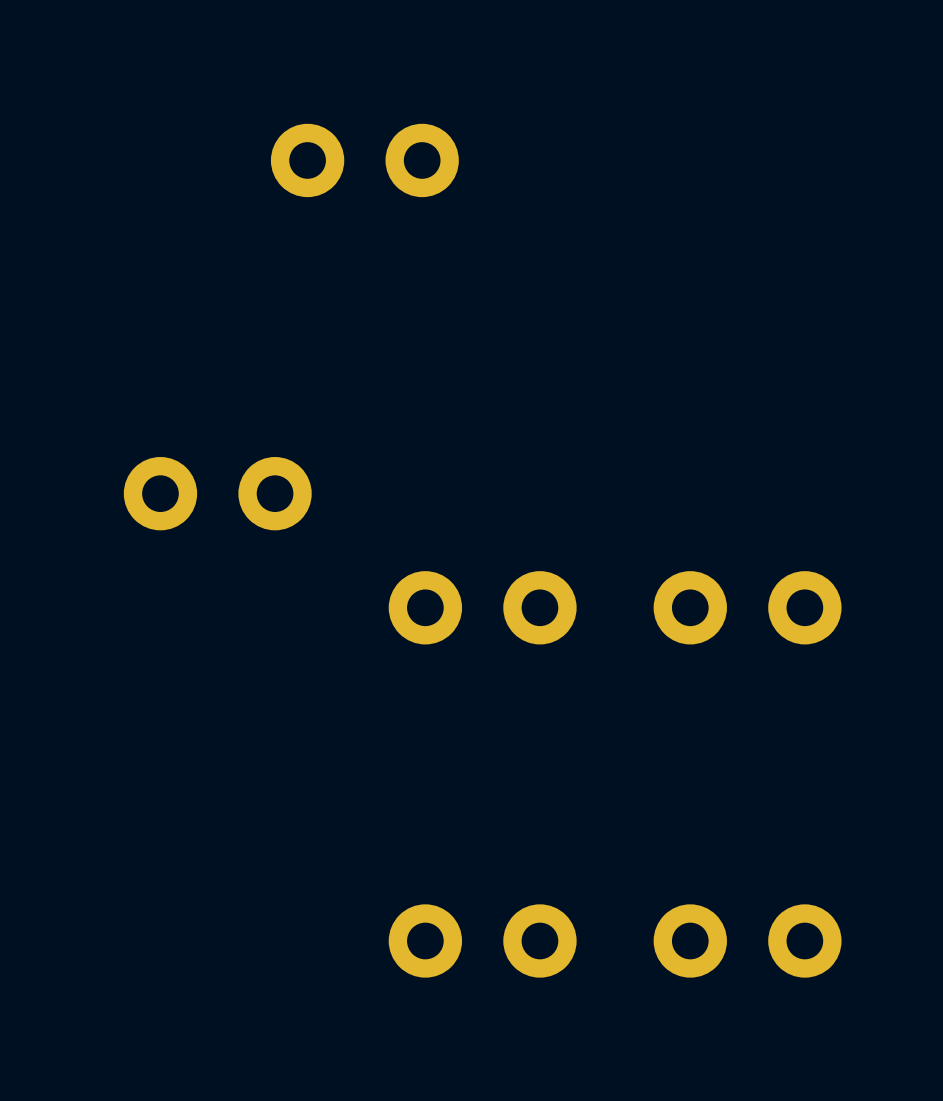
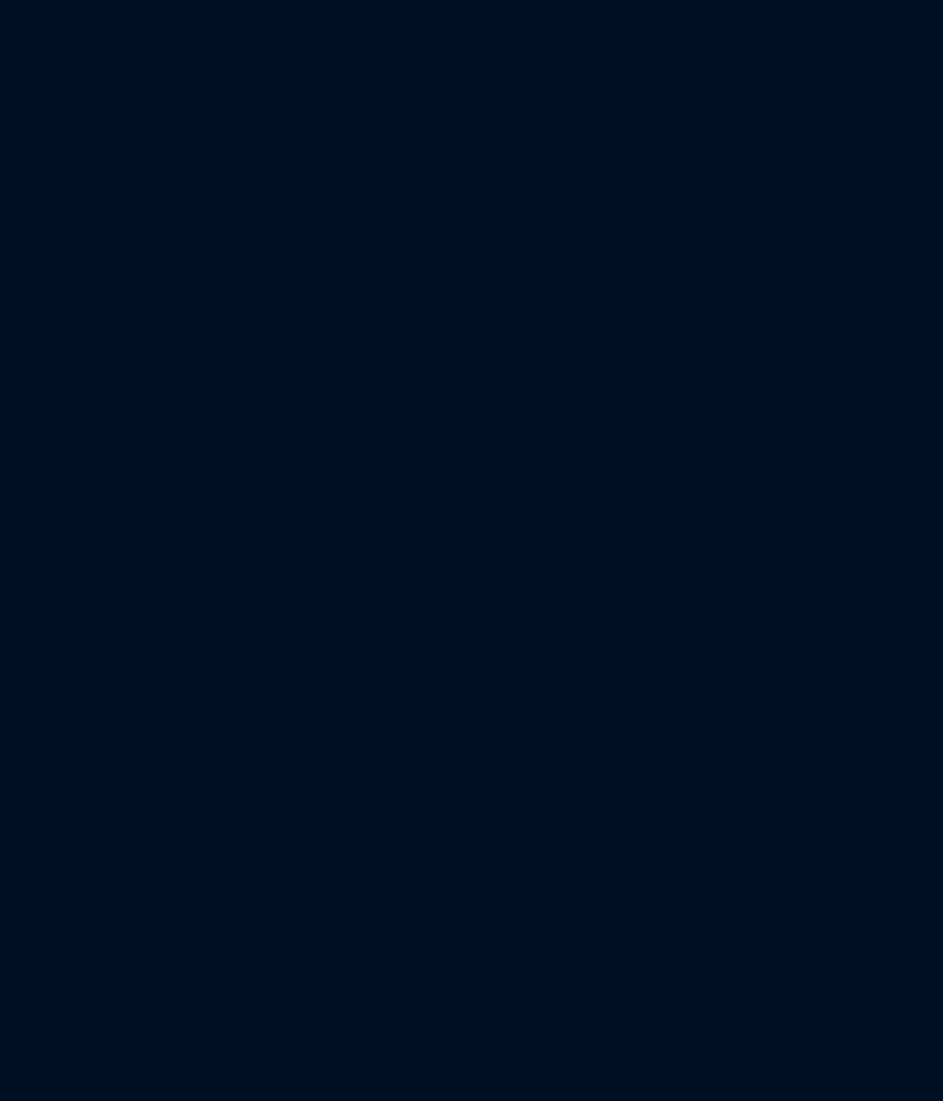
part: (364, 160) -> none
part: (217, 493) -> none
part: (482, 607) -> none
part: (747, 607) -> none
part: (482, 940) -> none
part: (747, 940) -> none

